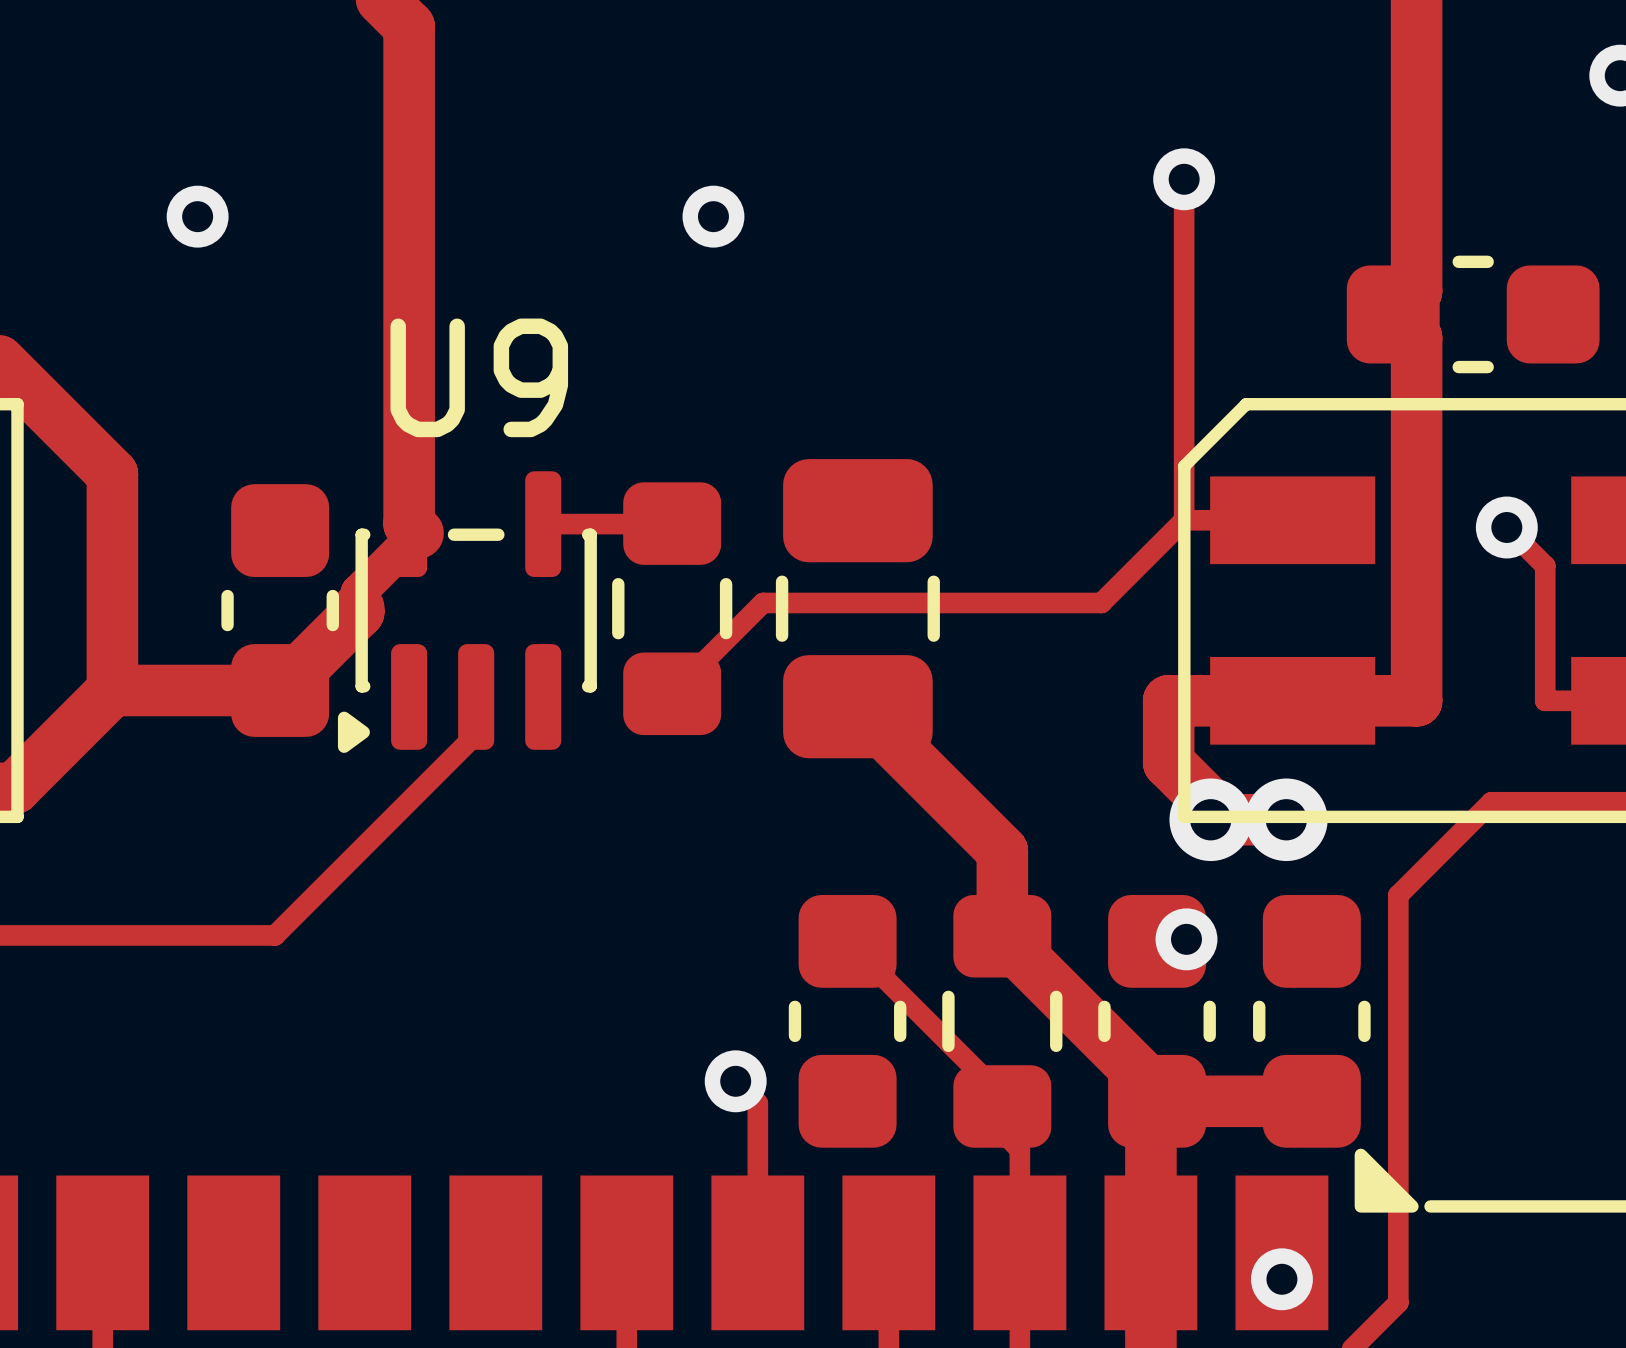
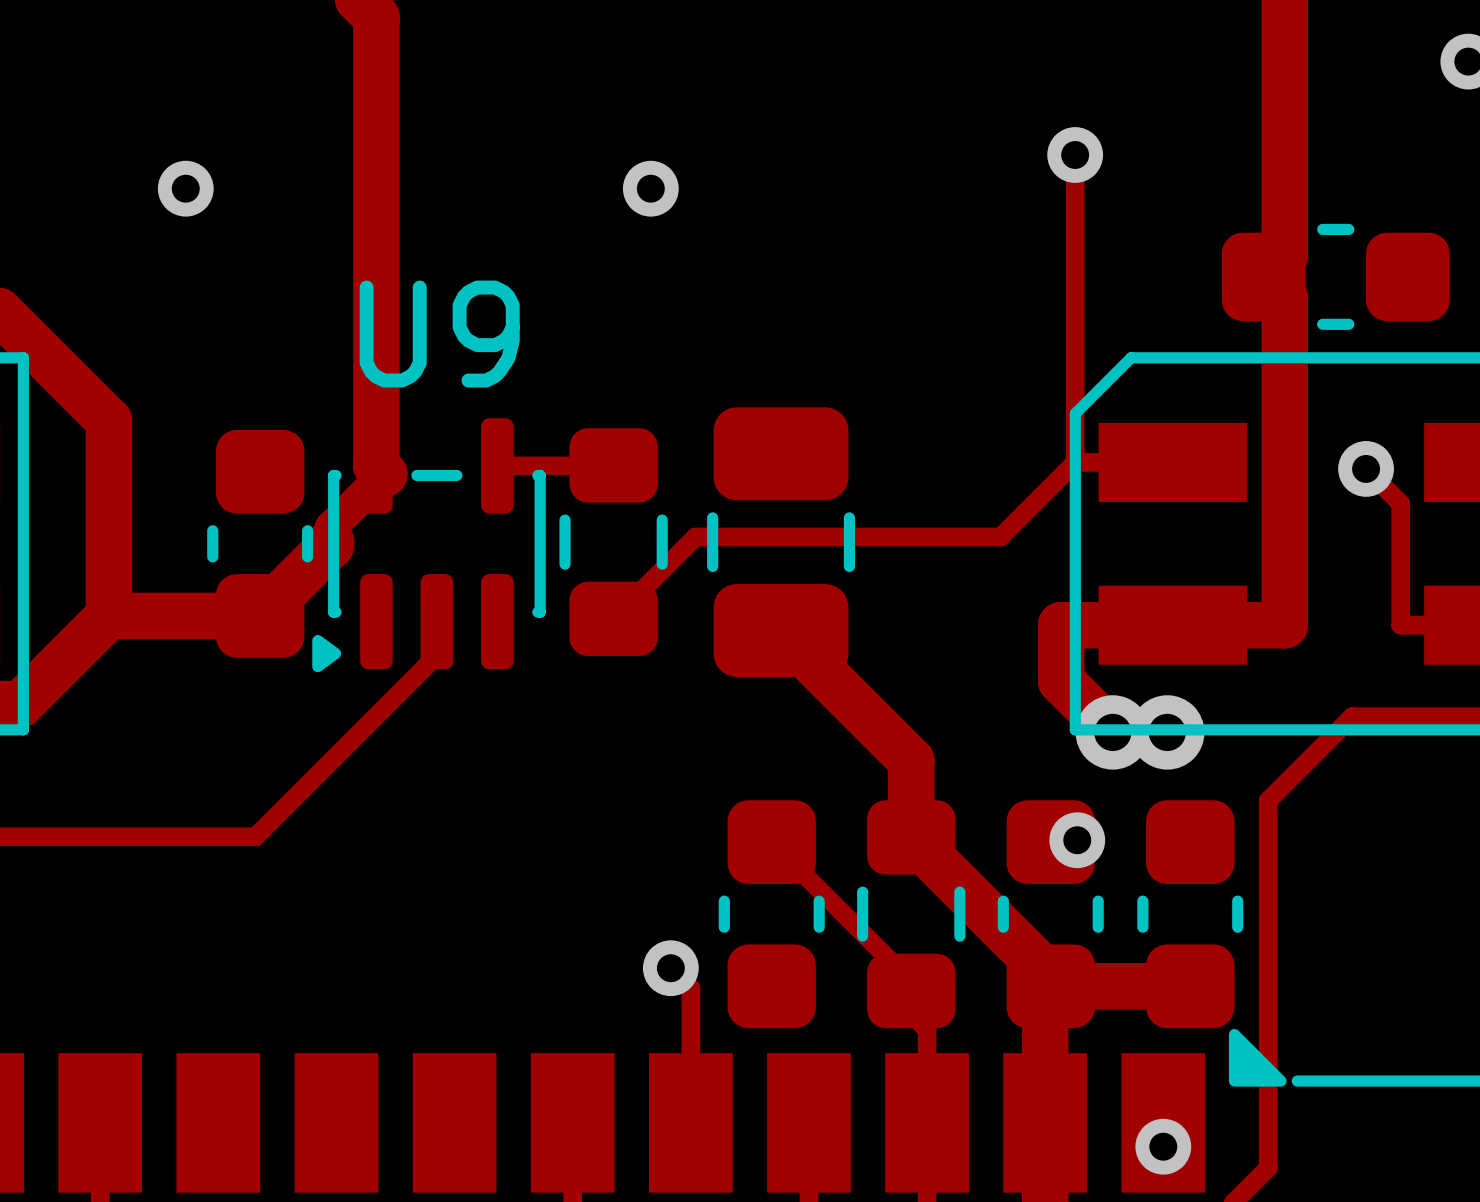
via position: (1210, 819) -> (1112, 732)

